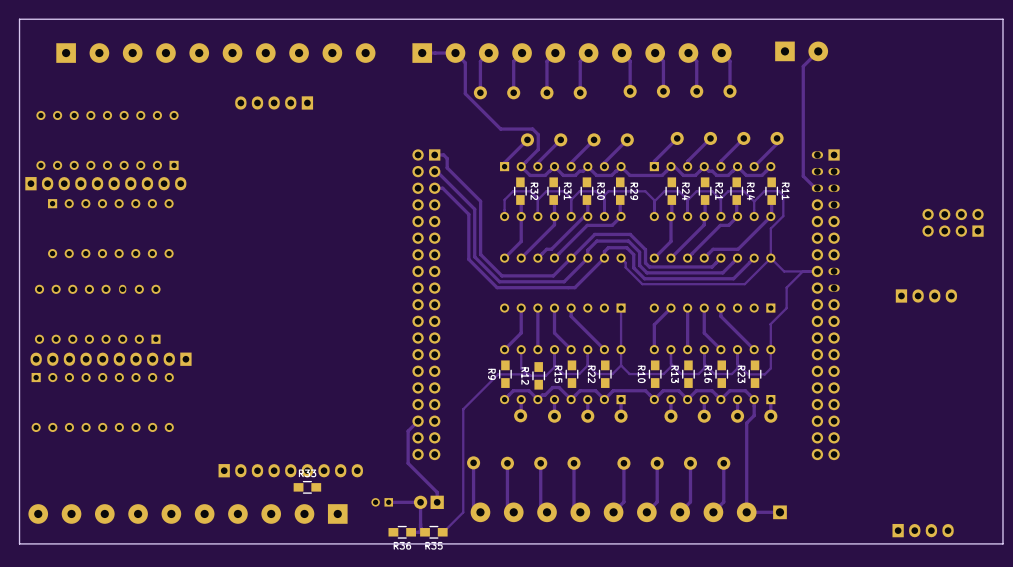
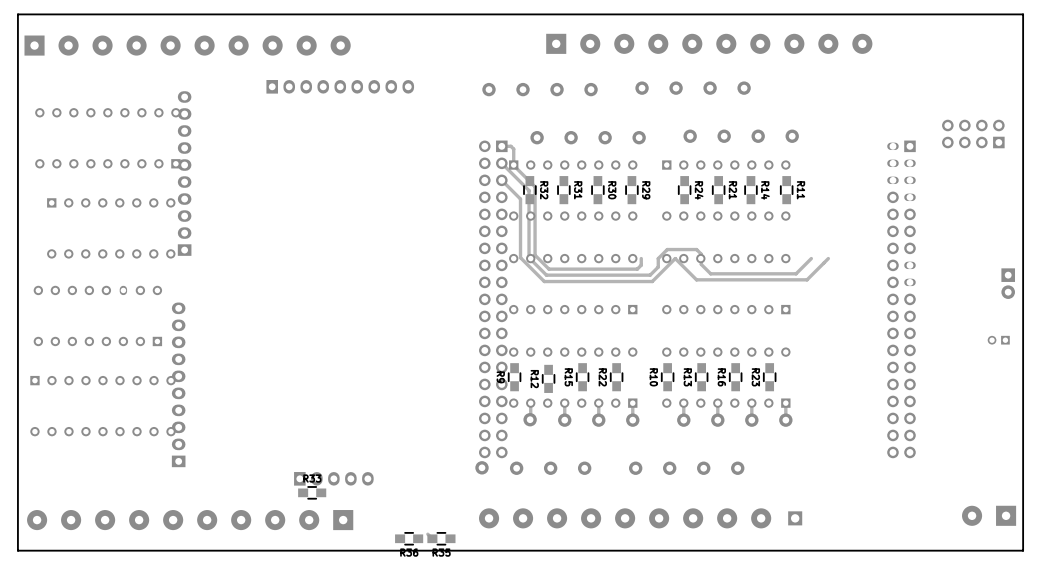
part: (801, 51) -> none
track: (818, 51) (803, 66) (803, 176) (817, 188) -> none
part position: (215, 53) -> (187, 45)
track: (422, 53) (455, 53) (465, 62) (465, 93) (500, 129) (532, 129) (538, 134) (538, 149) (521, 166) (530, 175) (545, 175) (554, 166) (563, 175) (575, 175) (587, 166) (596, 175) (611, 175) (621, 166) (629, 175) (662, 175) (670, 166) (674, 166) (683, 175) (695, 175) (704, 166) (716, 175) (728, 175) (737, 166) (746, 175) (762, 175) (770, 166) -> none
track: (488, 53) (480, 61) (480, 92) -> none
track: (522, 53) (513, 61) (513, 92) -> none
track: (555, 53) (546, 61) (546, 92) -> none
part position: (571, 53) -> (709, 43)
track: (588, 53) (580, 61) (580, 92) -> none
track: (621, 53) (630, 61) (630, 91) -> none
track: (655, 53) (663, 61) (663, 91) -> none
track: (688, 53) (696, 61) (696, 91) -> none
track: (721, 53) (730, 61) (730, 91) -> none
part: none -> (340, 86)
part: (274, 102) -> none
track: (677, 138) (654, 161) (654, 166) -> none
track: (710, 138) (687, 161) (687, 166) -> none
track: (743, 138) (720, 161) (720, 166) -> none
track: (777, 138) (777, 143) (754, 166) -> none
track: (527, 139) (504, 162) -> (501, 146) (510, 146) (513, 149) (513, 161)
track: (560, 139) (537, 162) (537, 166) -> none
track: (594, 139) (571, 162) (571, 166) -> none
track: (627, 139) (604, 162) (604, 166) -> none
track: (434, 154) (443, 154) (447, 158) (447, 167) (480, 201) (480, 254) (501, 275) (553, 275) (594, 234) (630, 234) (645, 249) (645, 263) (649, 266) (712, 266) (720, 258) -> none
track: none -> (501, 163) (529, 190) (529, 257) (546, 275) (650, 275) (658, 267) (658, 258) (667, 249) (696, 249) (701, 254) (701, 264) (710, 273) (796, 273) (811, 258)
track: none -> (513, 165) (535, 186) (535, 255) (548, 269) (637, 269) (641, 265) (641, 258)
track: (434, 171) (437, 171) (474, 209) (474, 256) (499, 281) (564, 281) (587, 258) (587, 250) (596, 241) (628, 241) (639, 252) (639, 265) (647, 272) (722, 272) (737, 258) -> none
track: none -> (501, 180) (520, 199) (520, 257) (544, 281) (652, 281) (675, 258) (696, 279) (807, 279) (828, 258)
part rotation: 0° (105, 183) -> 90° counterclockwise (184, 173)
track: (434, 188) (442, 188) (468, 214) (468, 259) (497, 287) (574, 287) (604, 258) (604, 251) (608, 247) (626, 247) (633, 254) (633, 267) (644, 278) (733, 278) (754, 258) -> none
track: (537, 199) (546, 191) (563, 191) (571, 198) (571, 216) -> none
track: (604, 199) (595, 191) (579, 191) (571, 199) -> none
track: (720, 199) (712, 191) (696, 191) (687, 200) -> none
track: (520, 200) (521, 241) (504, 258) -> none
track: (553, 200) (554, 224) (521, 258) -> none
track: (586, 200) (587, 216) (584, 216) (551, 249) (546, 249) (537, 258) -> none
track: (620, 200) (621, 216) (612, 225) (587, 225) (554, 258) -> none
track: (671, 200) (670, 241) (654, 258) -> none
track: (705, 200) (704, 224) (670, 258) -> none
track: (736, 200) (737, 216) (728, 225) (720, 225) (687, 258) -> none
track: (771, 200) (771, 215) (738, 249) (713, 249) (704, 258) -> none
track: (654, 201) (664, 191) (679, 191) (687, 199) (687, 216) -> none
track: (754, 201) (764, 191) (778, 191) (783, 195) (783, 216) (770, 228) (770, 258) -> none
track: (754, 201) (754, 216) -> none
track: (754, 201) (743, 191) (728, 191) (720, 198) (720, 216) -> none
track: (537, 216) (537, 198) (530, 191) (513, 191) (504, 199) (504, 216) -> none
track: (654, 216) (654, 200) (645, 191) (608, 191) (604, 195) (604, 216) -> none
part position: (953, 222) -> (973, 133)
track: (770, 258) (744, 284) (642, 284) (625, 267) (625, 262) (621, 258) -> none
track: (770, 258) (784, 271) (817, 271) -> none
track: (802, 271) (786, 287) (786, 308) (770, 324) (770, 368) (764, 374) (748, 374) (737, 363) -> none
part: none -> (1008, 283)
part: (926, 295) -> none
part position: (426, 304) -> (493, 299)
part position: (825, 304) -> (901, 299)
track: (521, 308) (521, 333) (504, 349) -> none
track: (537, 308) (537, 349) -> none
track: (554, 308) (554, 333) (571, 349) -> none
track: (571, 308) (571, 316) (604, 349) -> none
track: (621, 308) (621, 365) -> none
track: (670, 308) (654, 324) (654, 349) -> none
track: (687, 308) (687, 349) -> none
track: (704, 308) (704, 333) (720, 349) -> none
track: (720, 308) (720, 316) (754, 349) -> none
part: none -> (998, 340)
track: (554, 349) (554, 367) (545, 375) (528, 375) (521, 368) (521, 349) -> none
track: (587, 349) (587, 365) (579, 374) (563, 374) (554, 365) -> none
track: (670, 349) (670, 366) (663, 374) (629, 374) (621, 365) -> none
track: (704, 349) (704, 368) (698, 374) (681, 374) (670, 363) -> none
track: (737, 349) (737, 368) (731, 374) (714, 374) (704, 363) -> none
part rotation: 0° (111, 359) -> 90° clockwise (178, 384)
track: (587, 365) (596, 374) (612, 374) (621, 365) -> none
track: (530, 375) (498, 374) (463, 409) (463, 512) (442, 532) -> none
track: (504, 399) (513, 390) (529, 390) (537, 399) (552, 387) (559, 387) (571, 399) (579, 390) (595, 390) (604, 399) (613, 390) (645, 390) (654, 399) (663, 390) (678, 390) (687, 399) (696, 390) (712, 390) (720, 399) (729, 390) (745, 390) (754, 399) (754, 415) (746, 423) (746, 512) (779, 512) -> none
track: (418, 421) (408, 431) (408, 463) (437, 492) (437, 502) -> none
track: (473, 462) (473, 505) (480, 512) -> none
track: (507, 463) (507, 506) (513, 512) -> none
track: (540, 463) (540, 506) (547, 512) -> none
track: (574, 463) (574, 506) (580, 512) -> none
track: (623, 463) (623, 501) (613, 512) -> none
track: (657, 463) (657, 501) (646, 512) -> none
track: (690, 463) (690, 501) (680, 512) -> none
track: (723, 463) (723, 501) (713, 512) -> none
part: (290, 470) -> none
part: none -> (333, 478)
part: (382, 502) -> none
track: (388, 502) (420, 502) (420, 531) (411, 532) -> none
part: (428, 502) -> none
part: none -> (989, 515)
part: (923, 530) -> none

